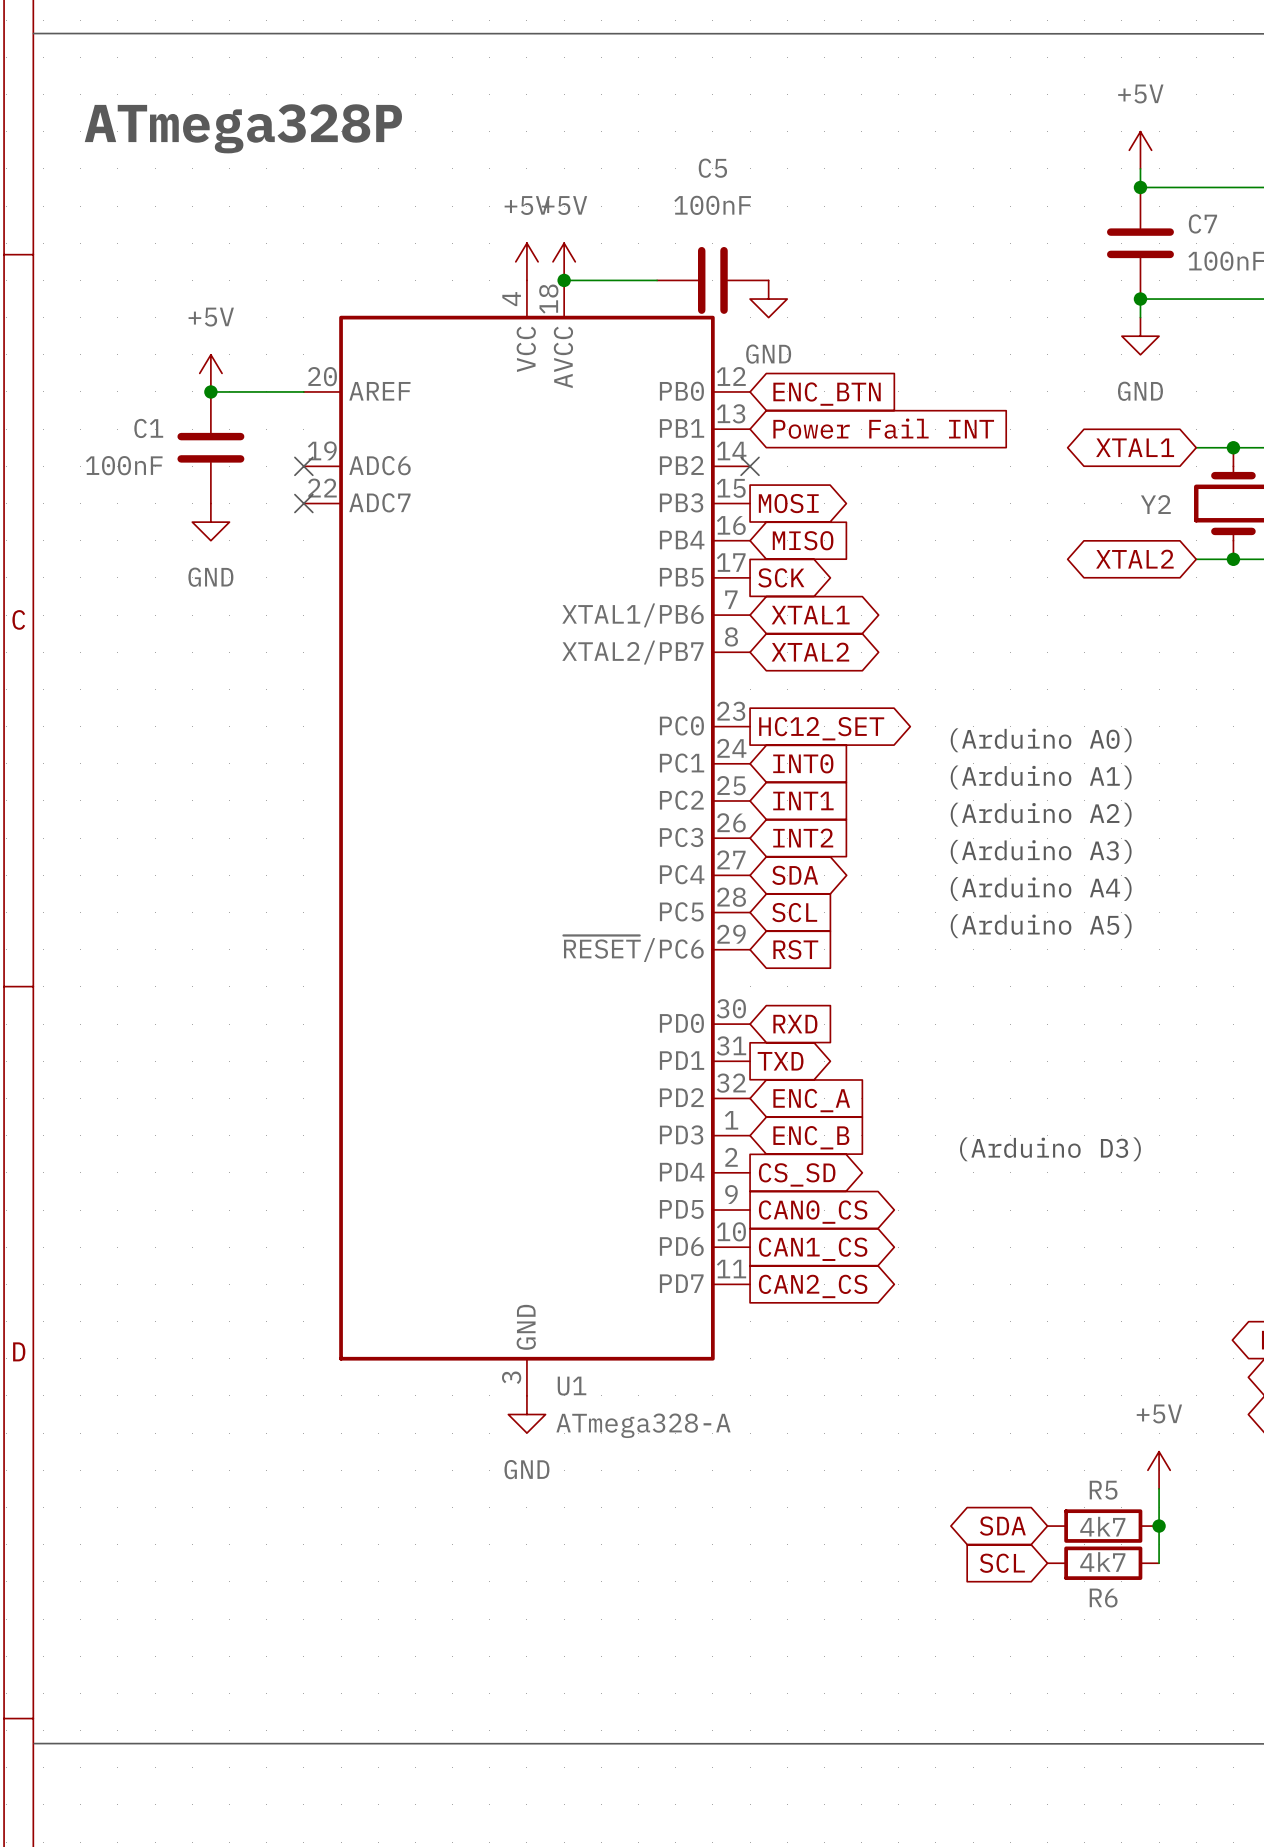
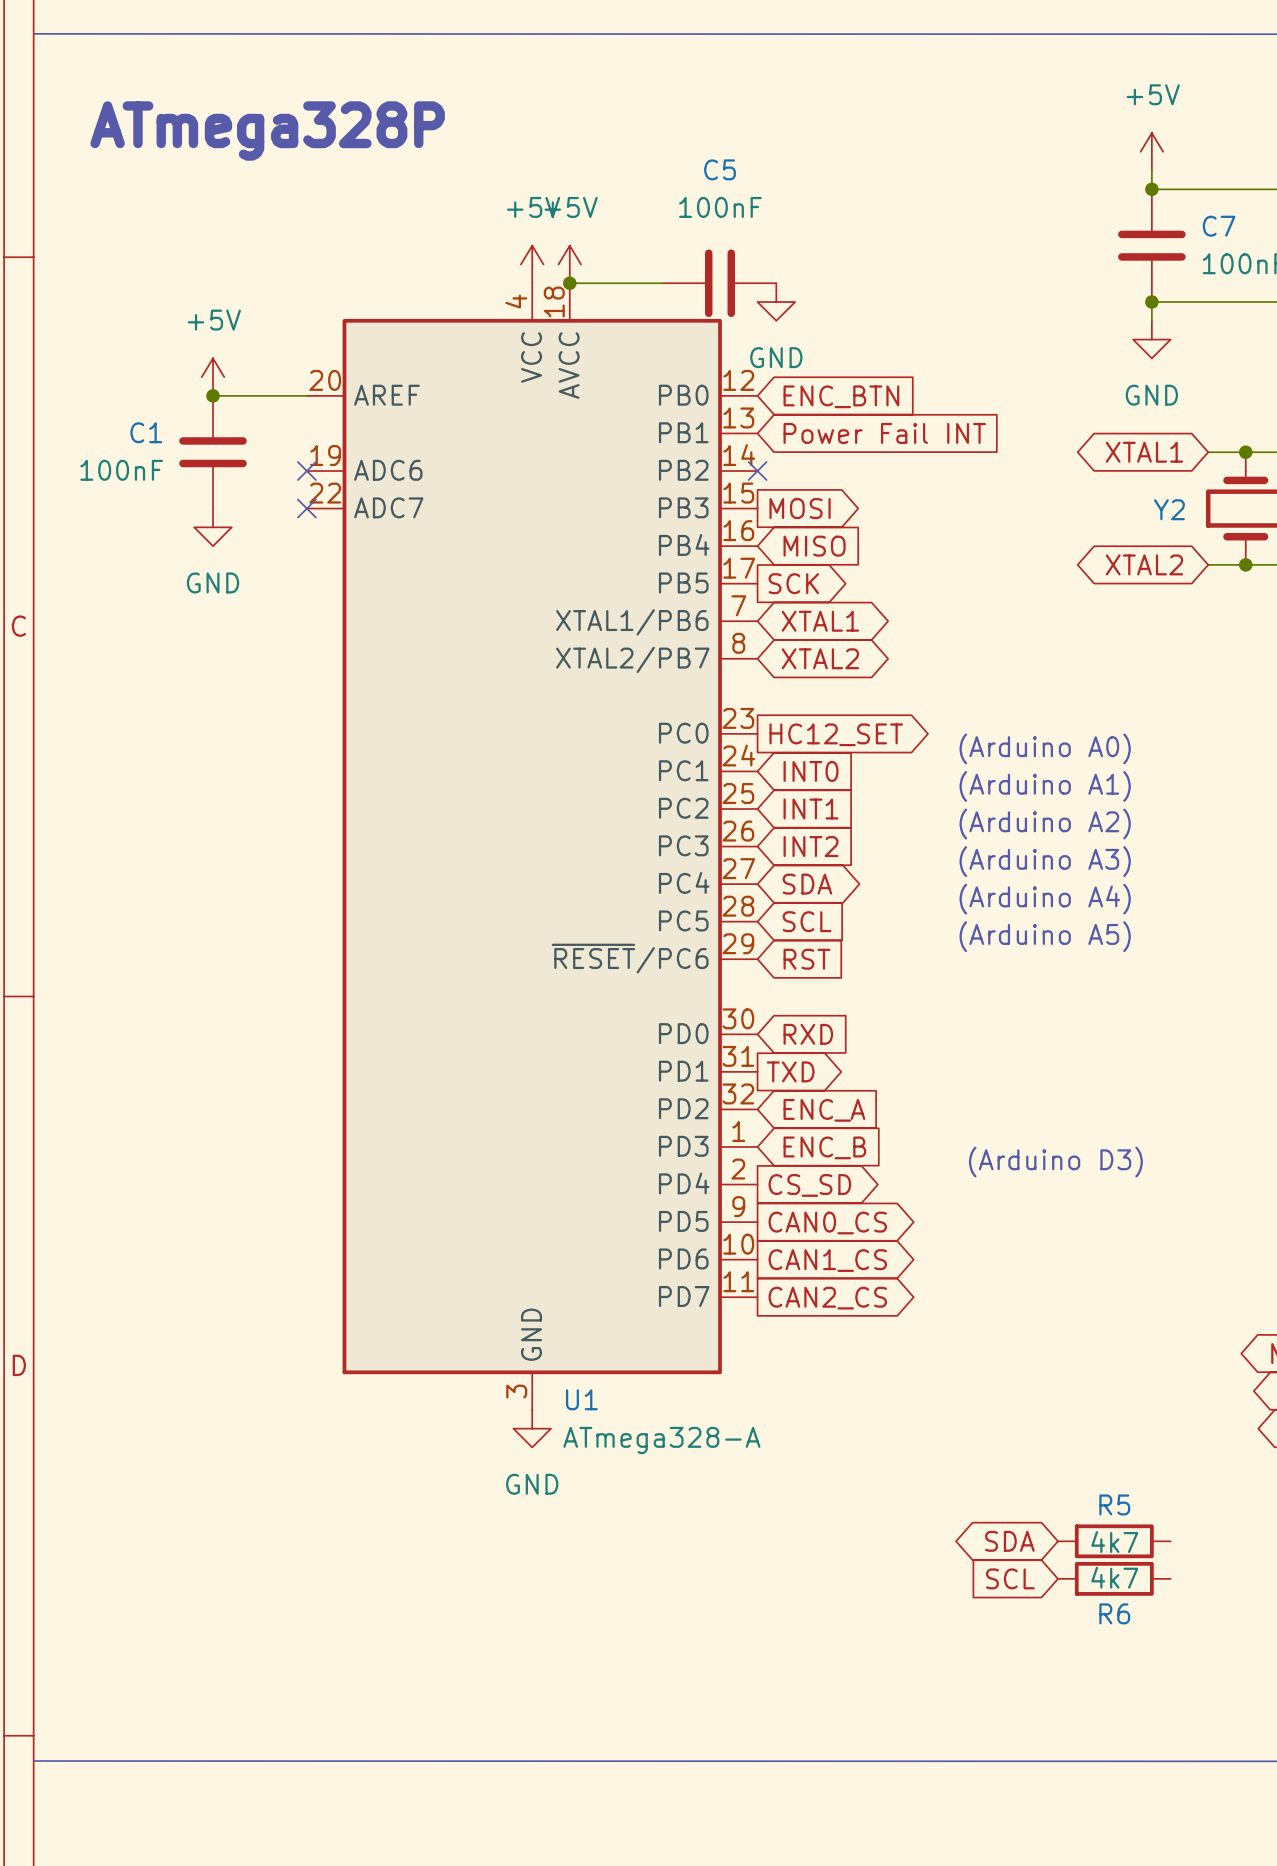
power symbol: +5V (1159, 1470) -> none
wire: (1159, 1488) (1159, 1563) -> none
junction: (1159, 1526) -> none

